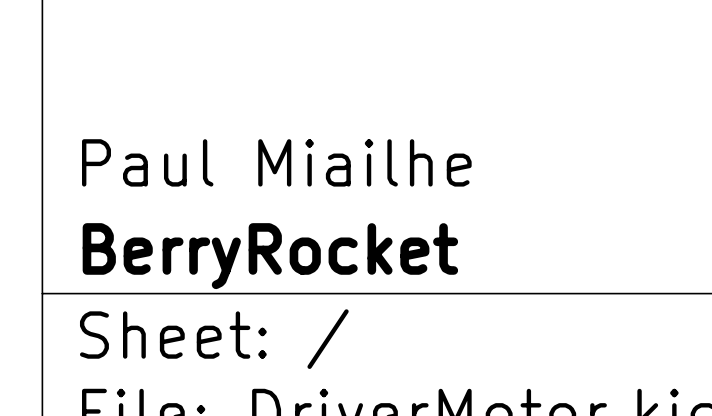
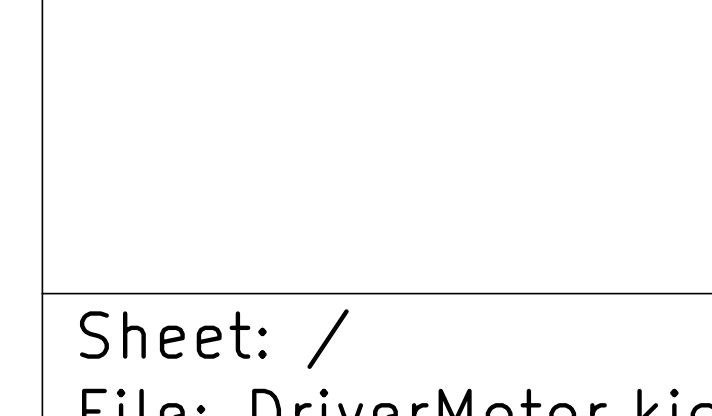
title block: Paul Miailhe (276, 162) -> none
title block: BerryRocket (270, 256) -> none

